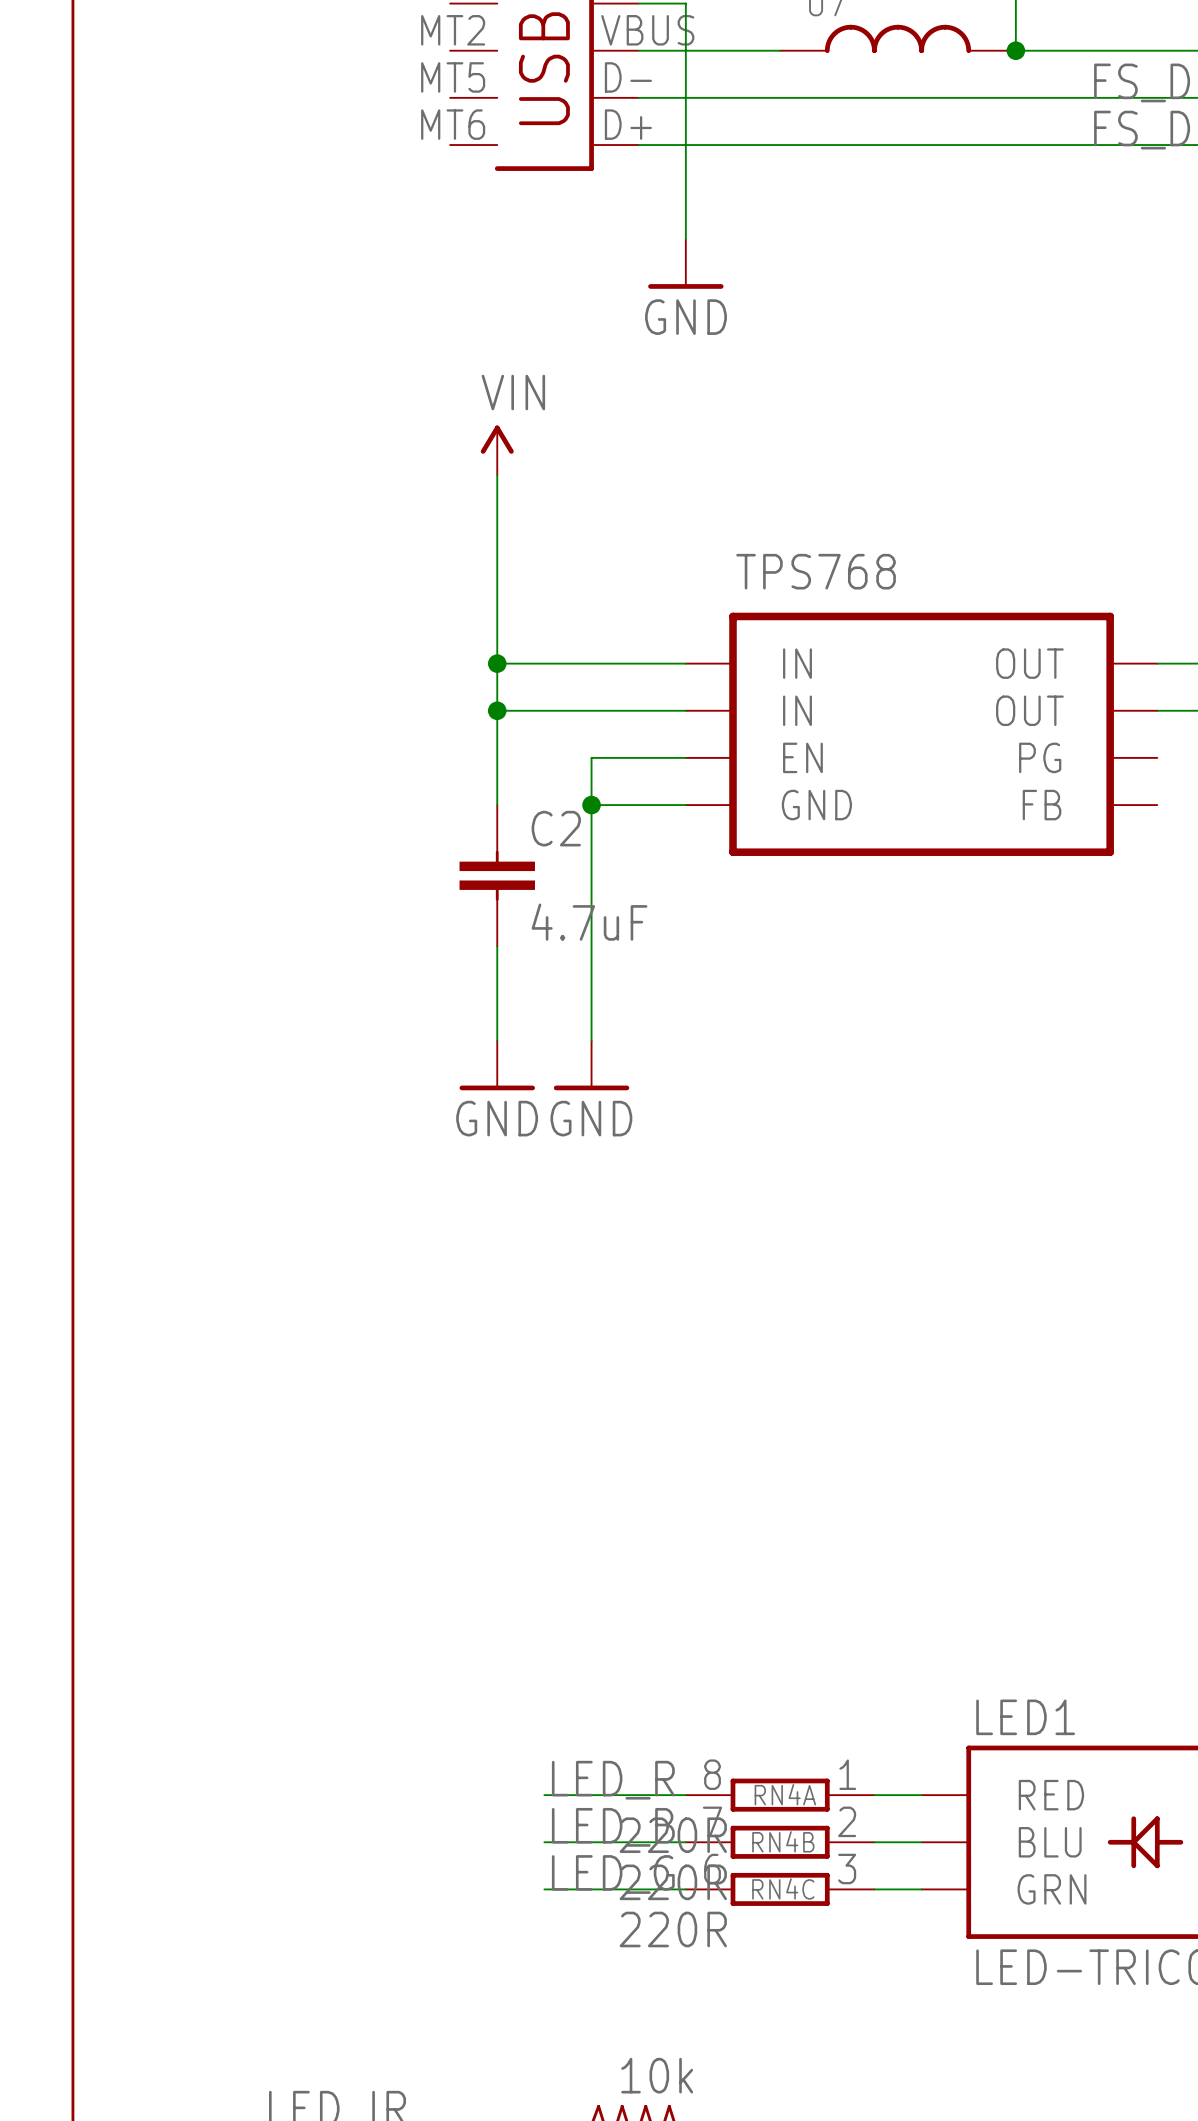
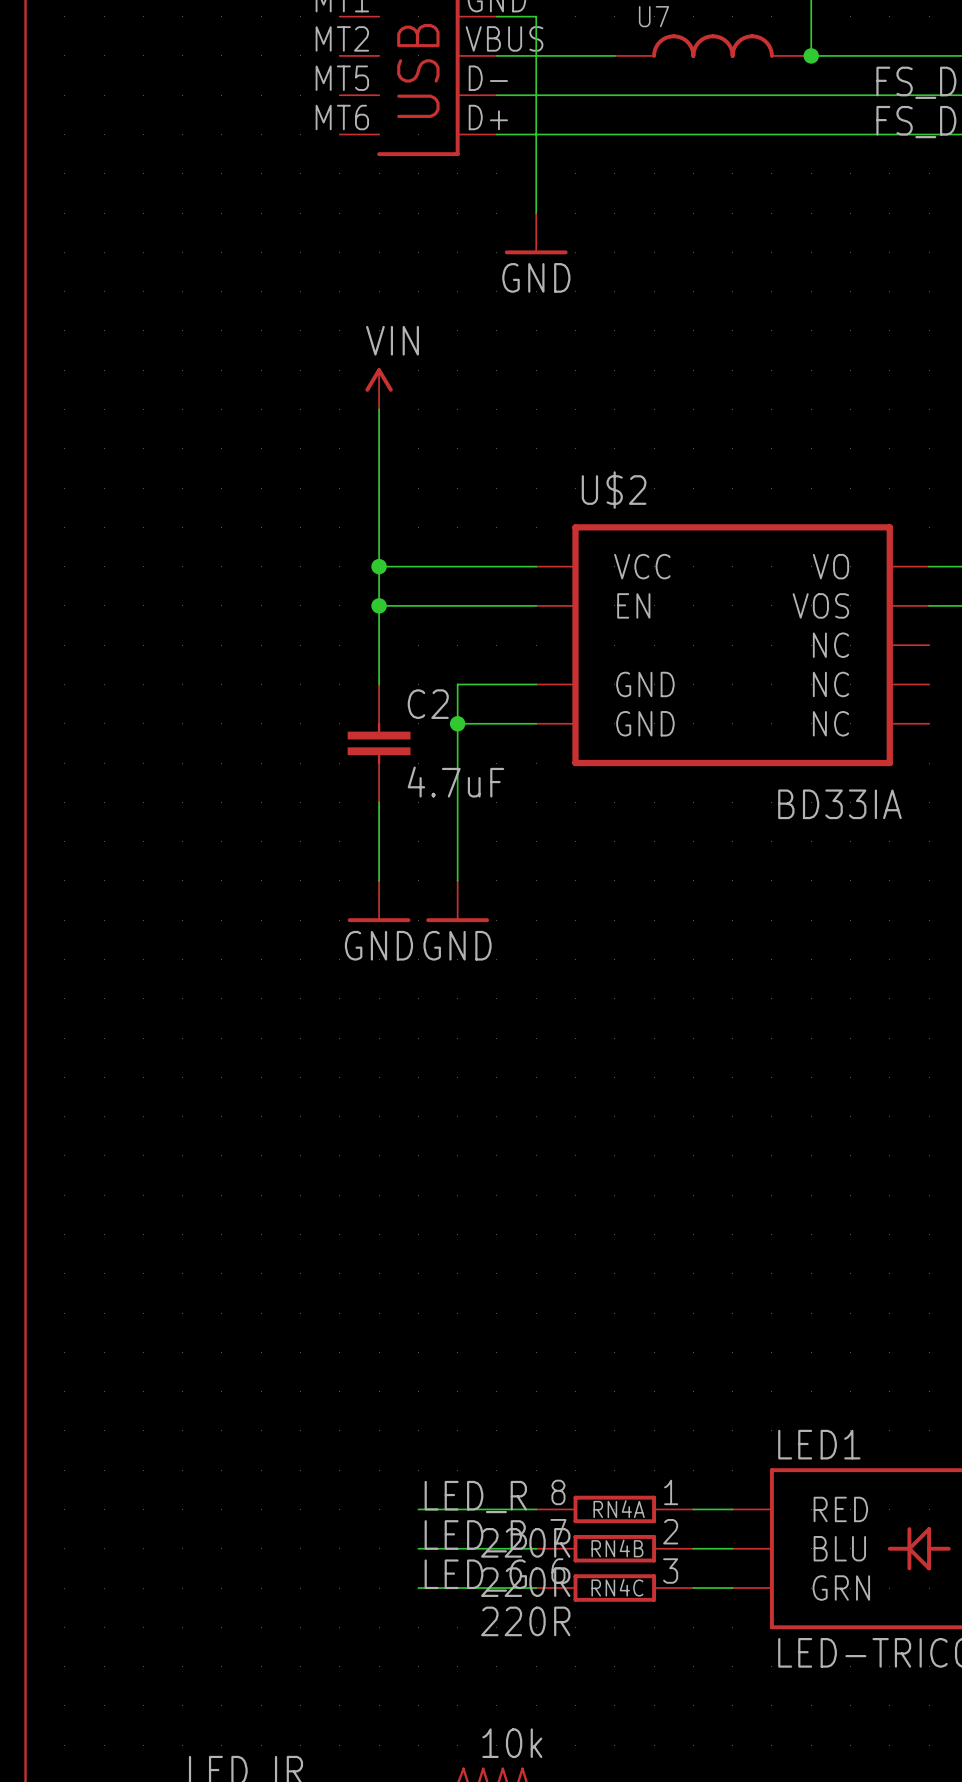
part: (921, 734) -> none
wire: (685, 757) (591, 757) (591, 805) -> none
U$2: none -> BD33IA (732, 645)
junction position: (591, 805) -> (457, 723)
wire: none -> (457, 723) (536, 723)

